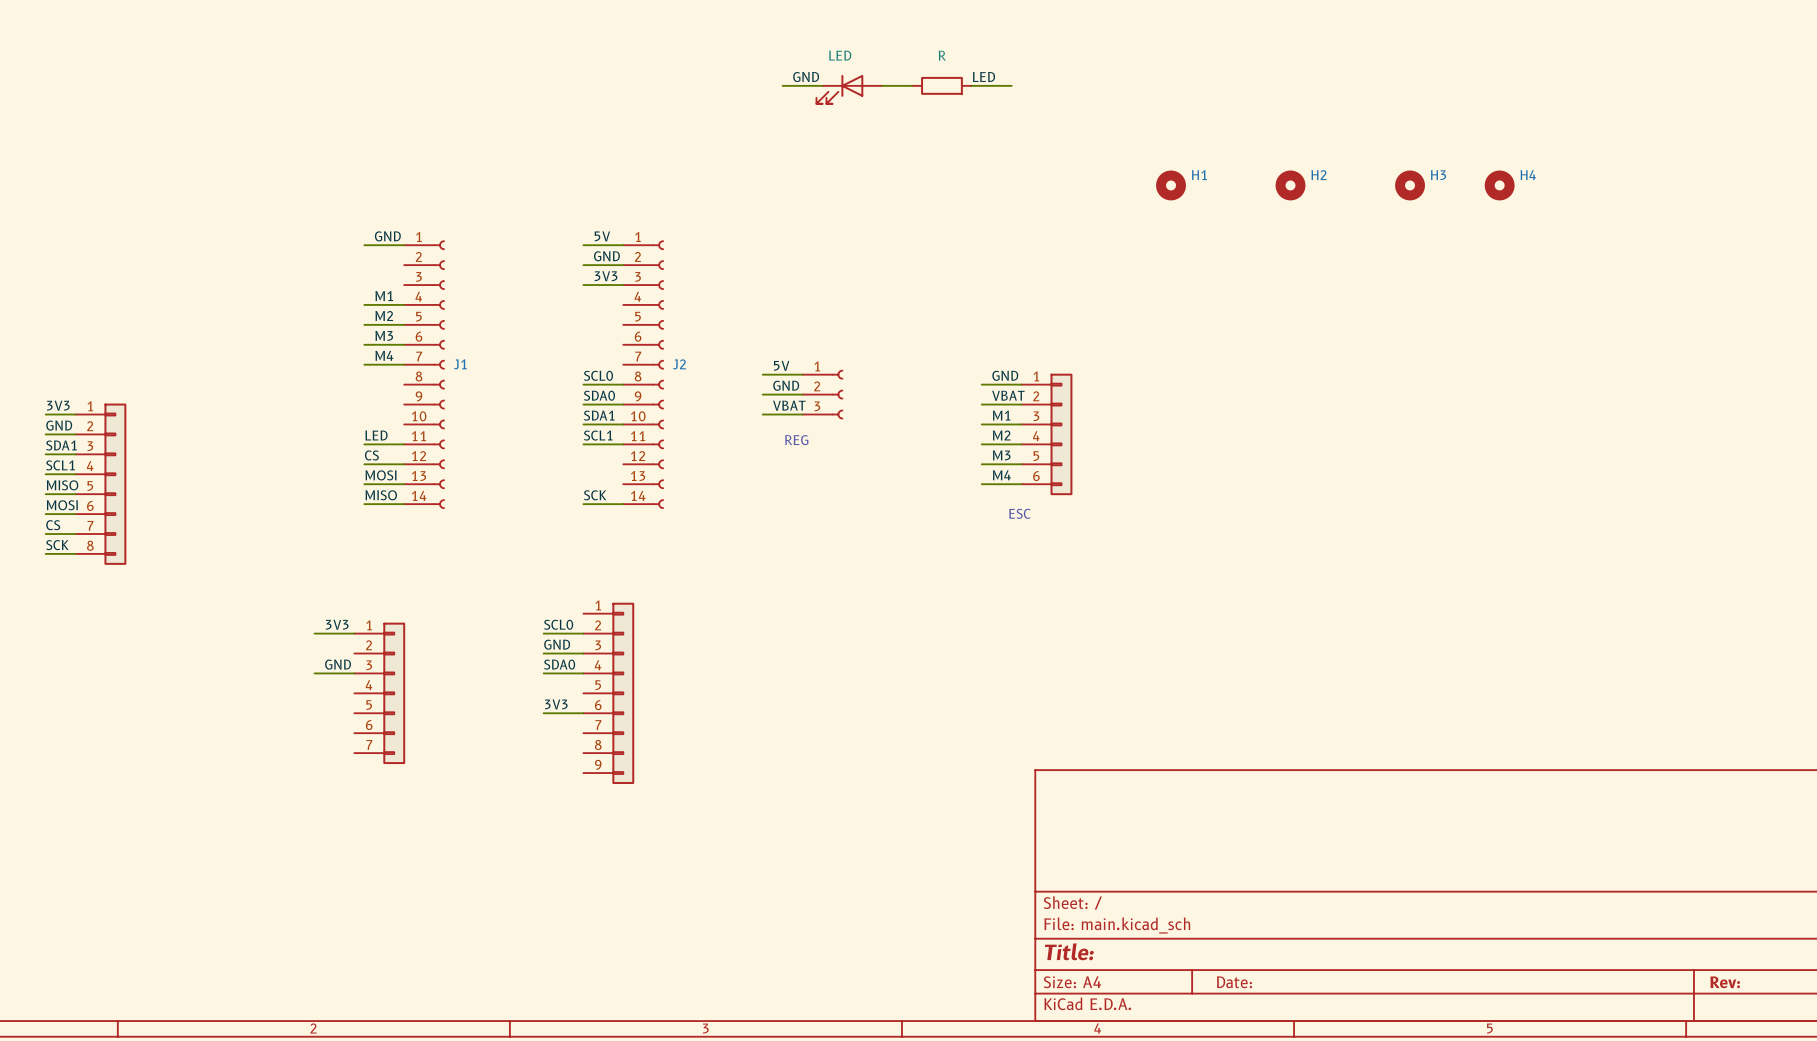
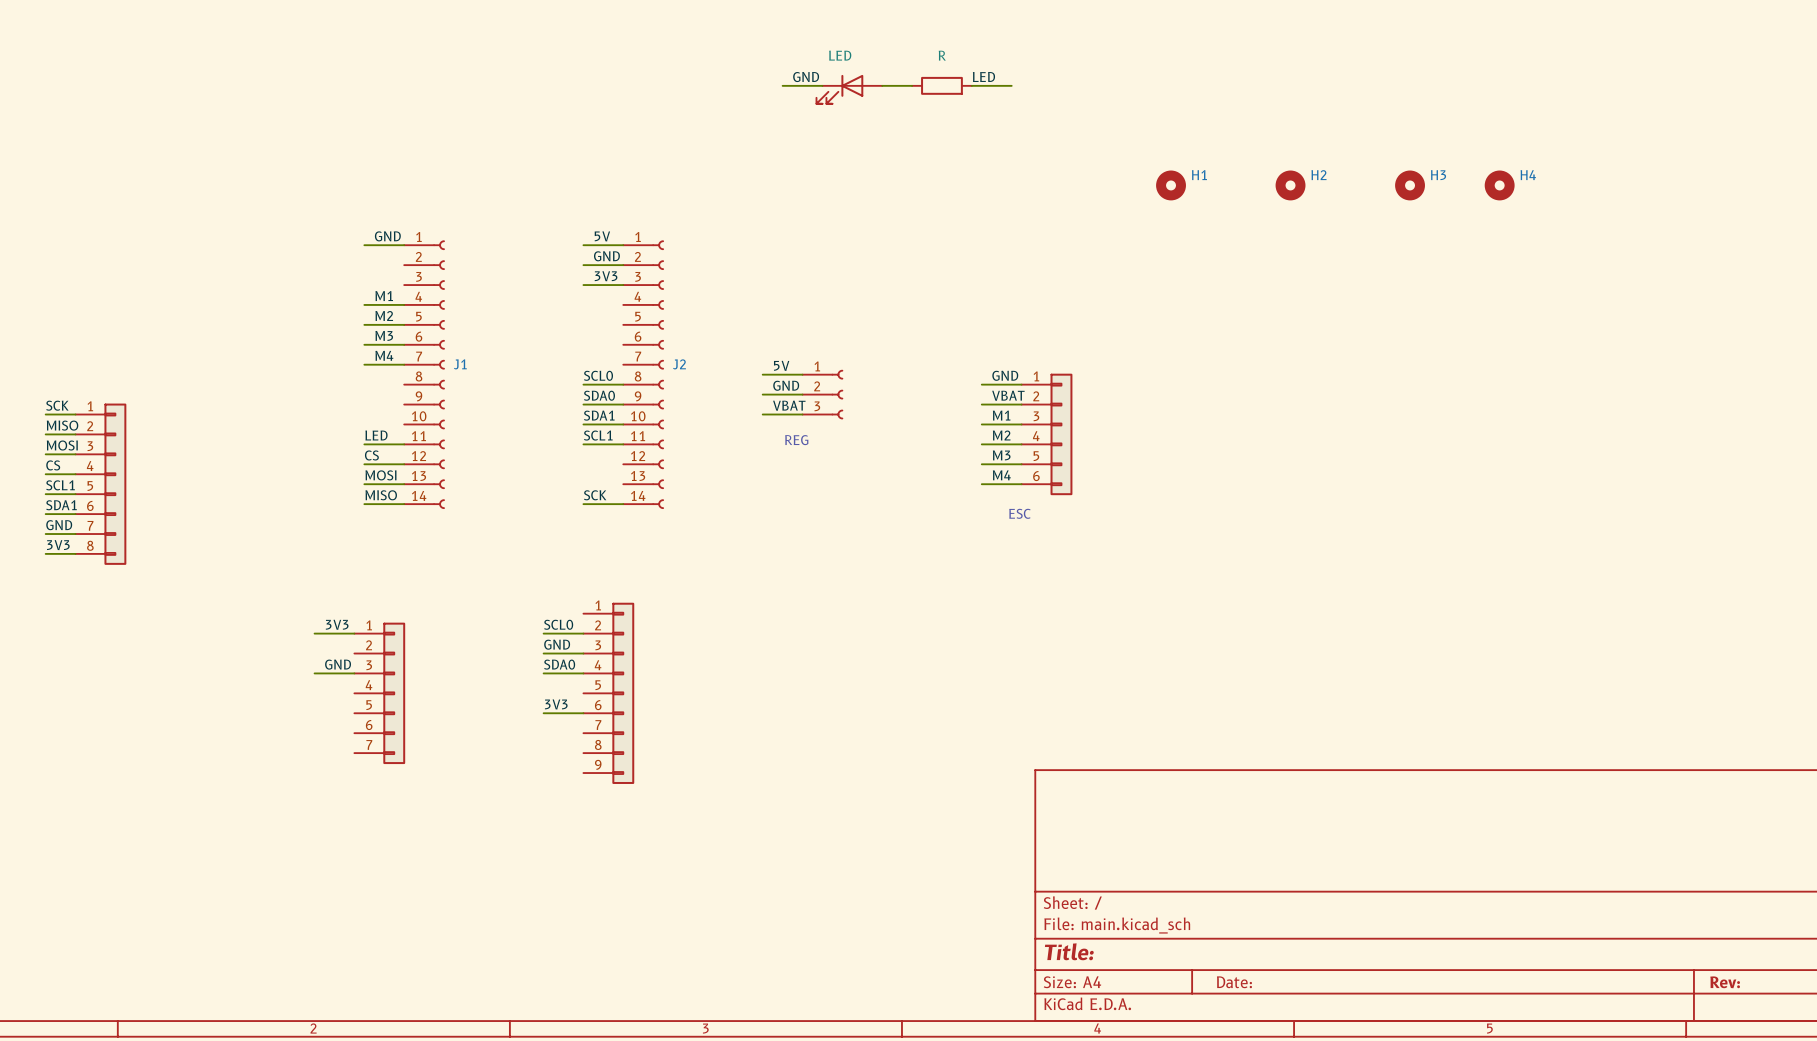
label: 3V3 (58, 405) -> SCK (57, 405)
label: GND (59, 425) -> MISO (62, 425)
label: SDA1 (61, 445) -> MOSI (62, 445)
label: SCL1 (60, 465) -> CS (53, 465)
label: MISO (62, 485) -> SCL1 (60, 485)
label: MOSI (62, 505) -> SDA1 (61, 505)
label: CS (53, 525) -> GND (59, 525)
label: SCK (57, 545) -> 3V3 (58, 545)

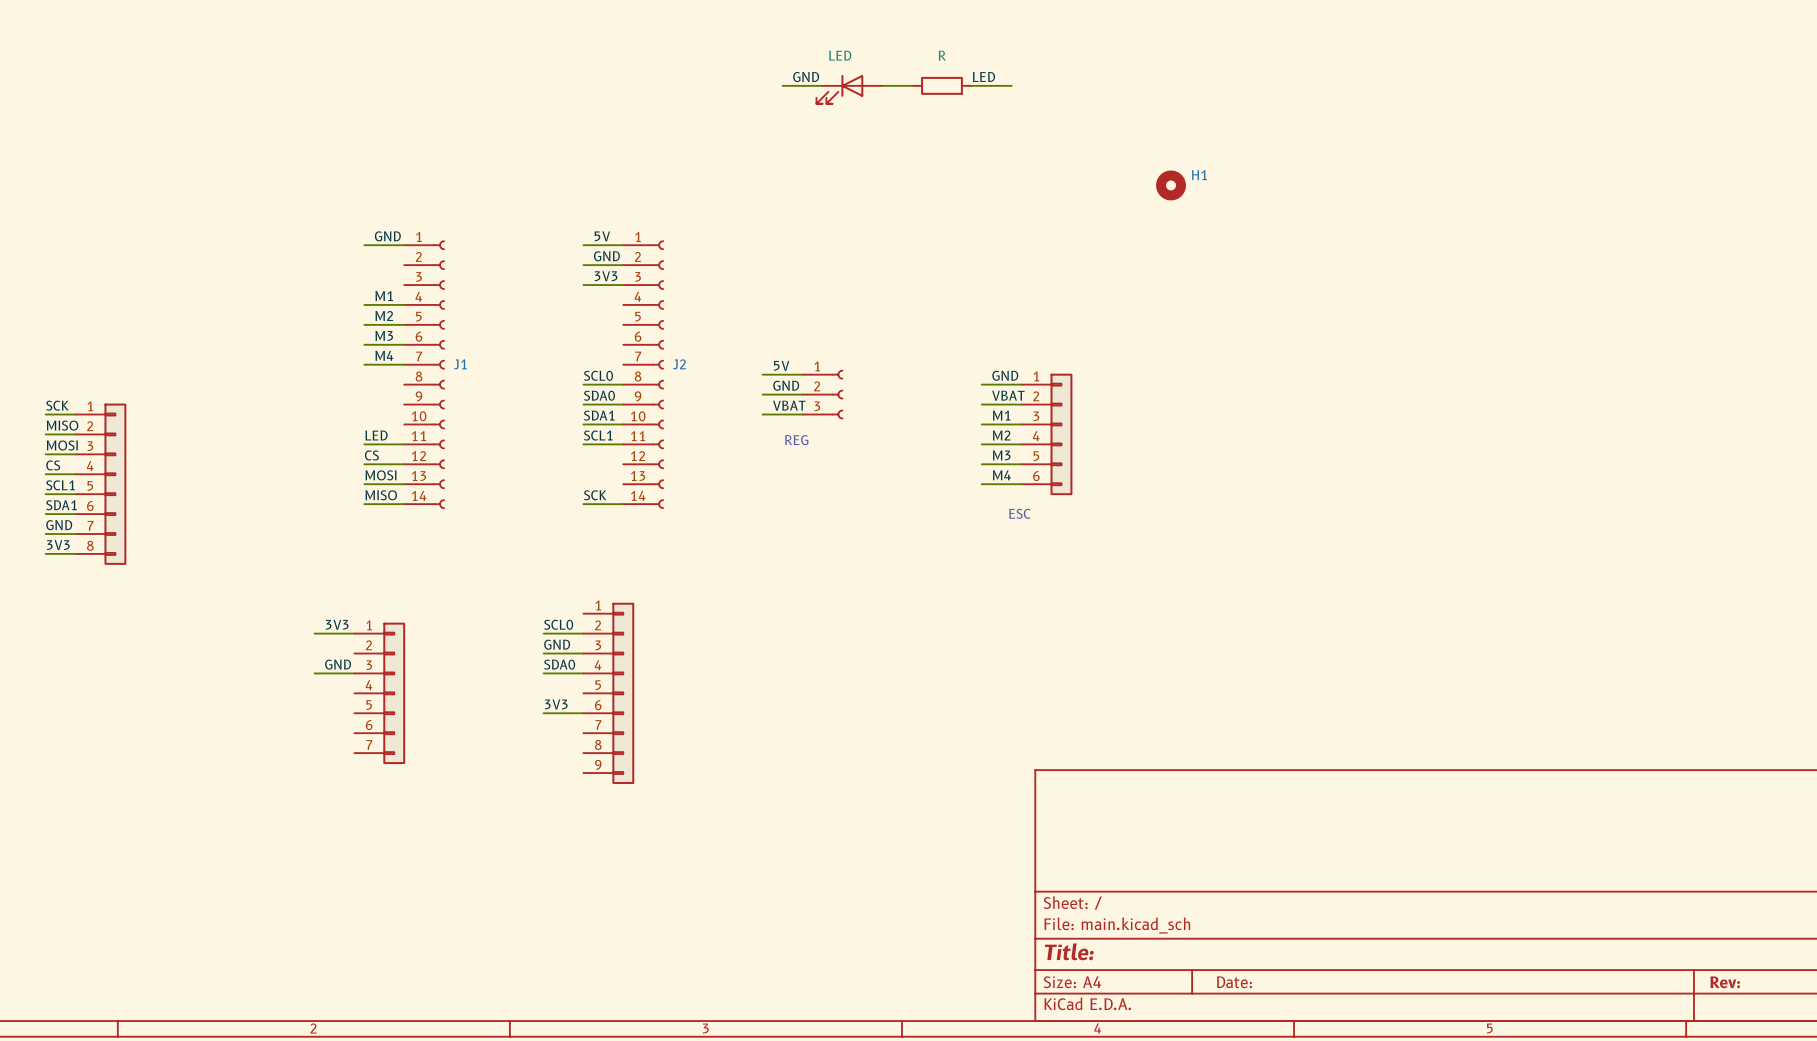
H2: (1290, 185) -> none
H3: (1410, 185) -> none
H4: (1499, 185) -> none

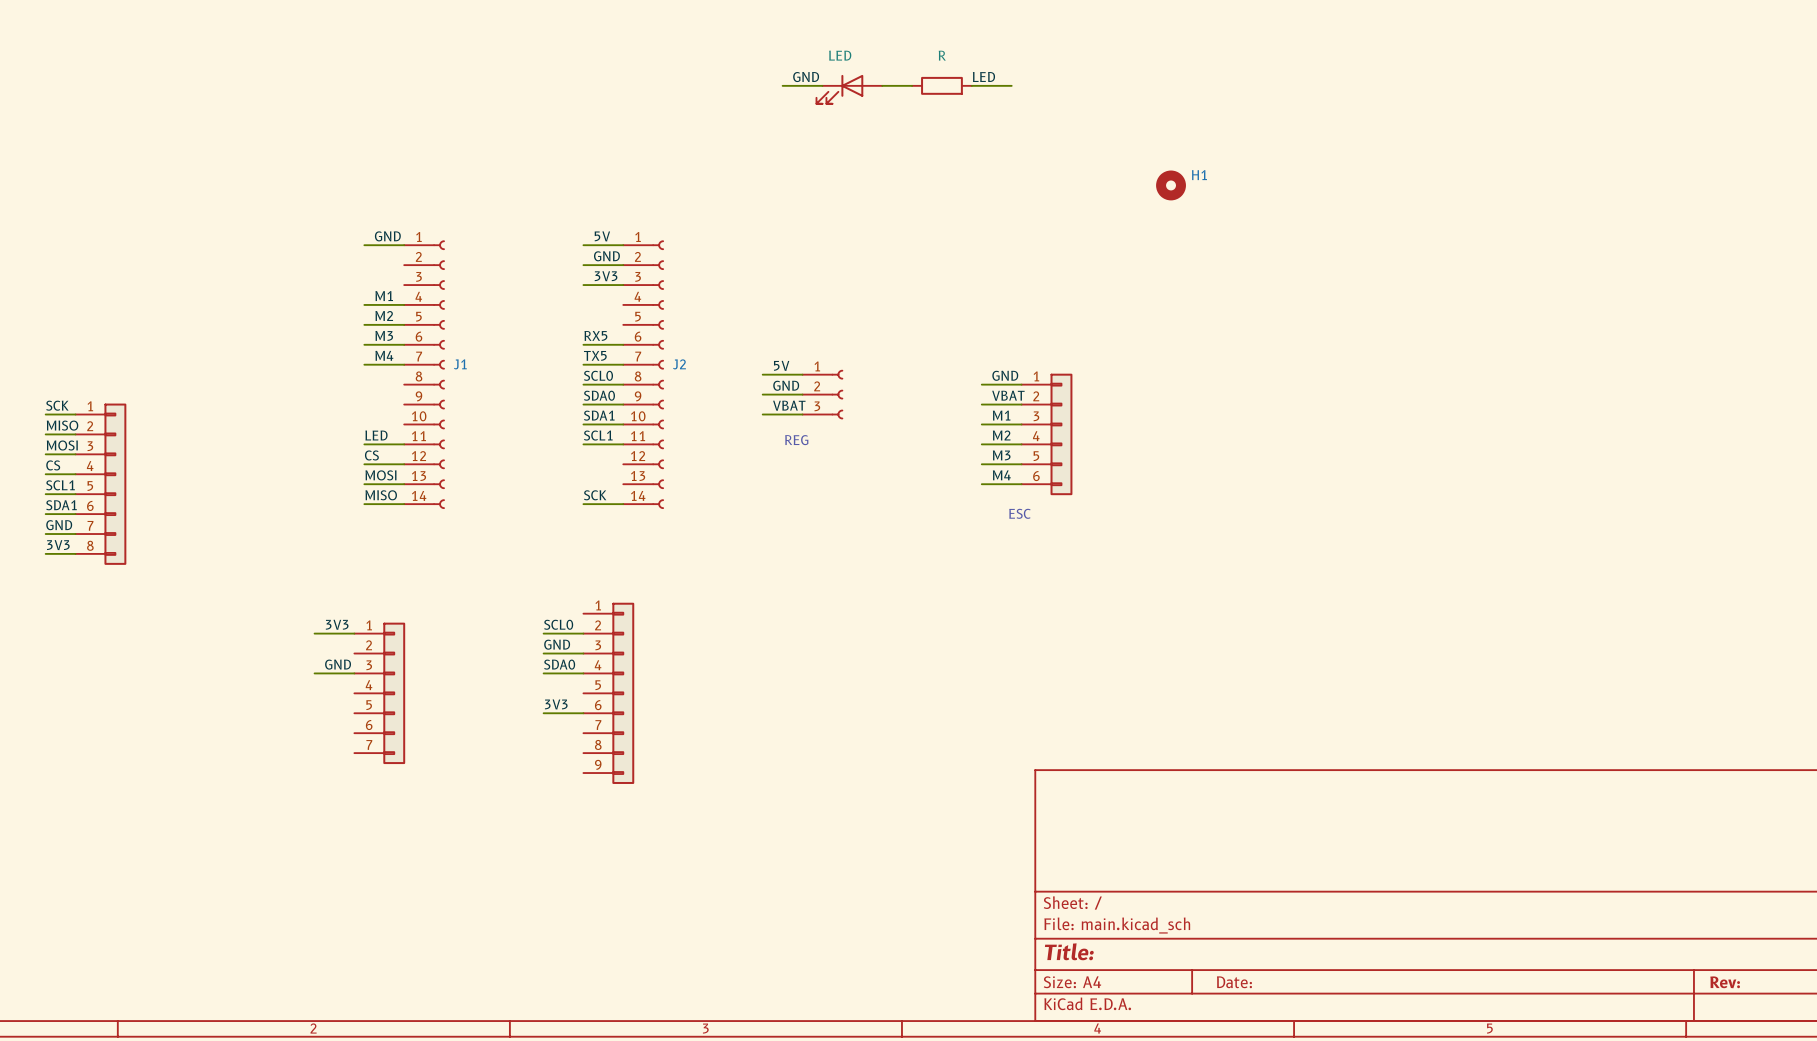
label: none -> RX5 (595, 335)
wire: none -> (583, 344) (623, 344)
label: none -> TX5 (595, 355)
wire: none -> (583, 364) (623, 364)

